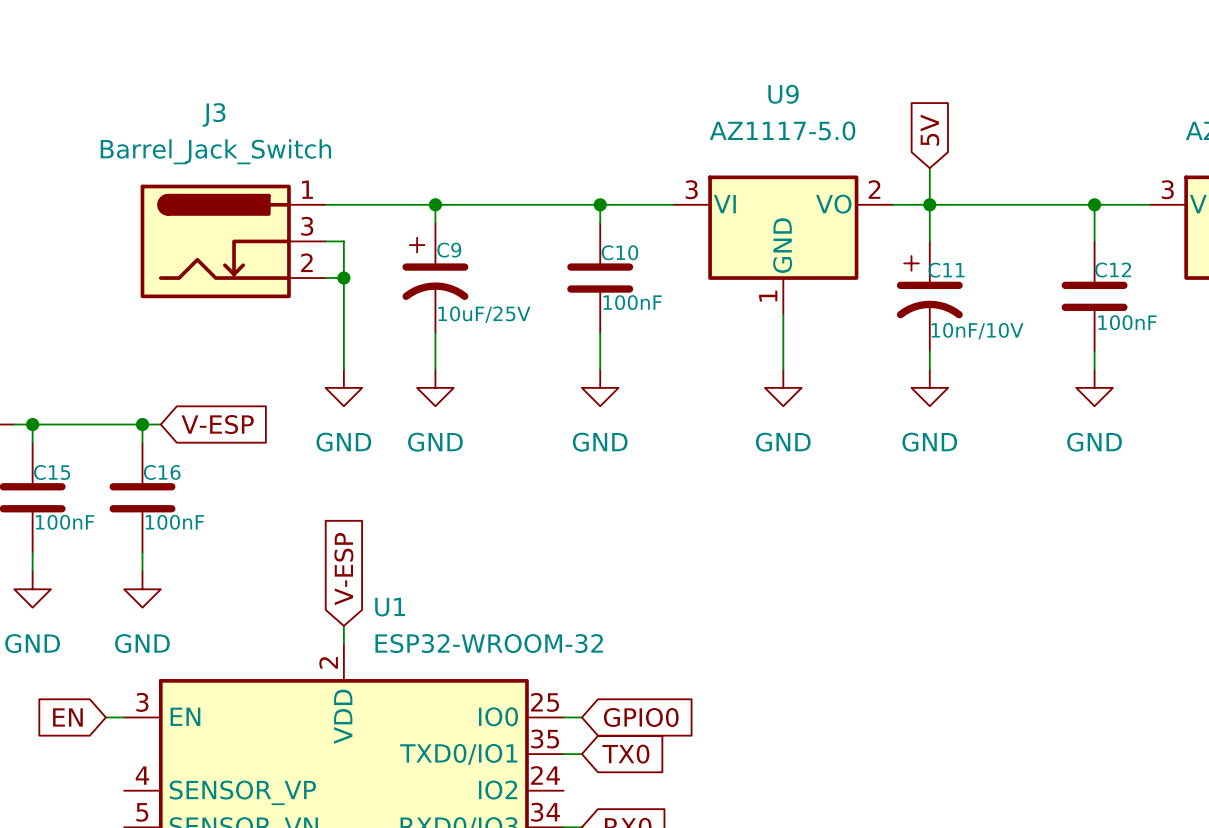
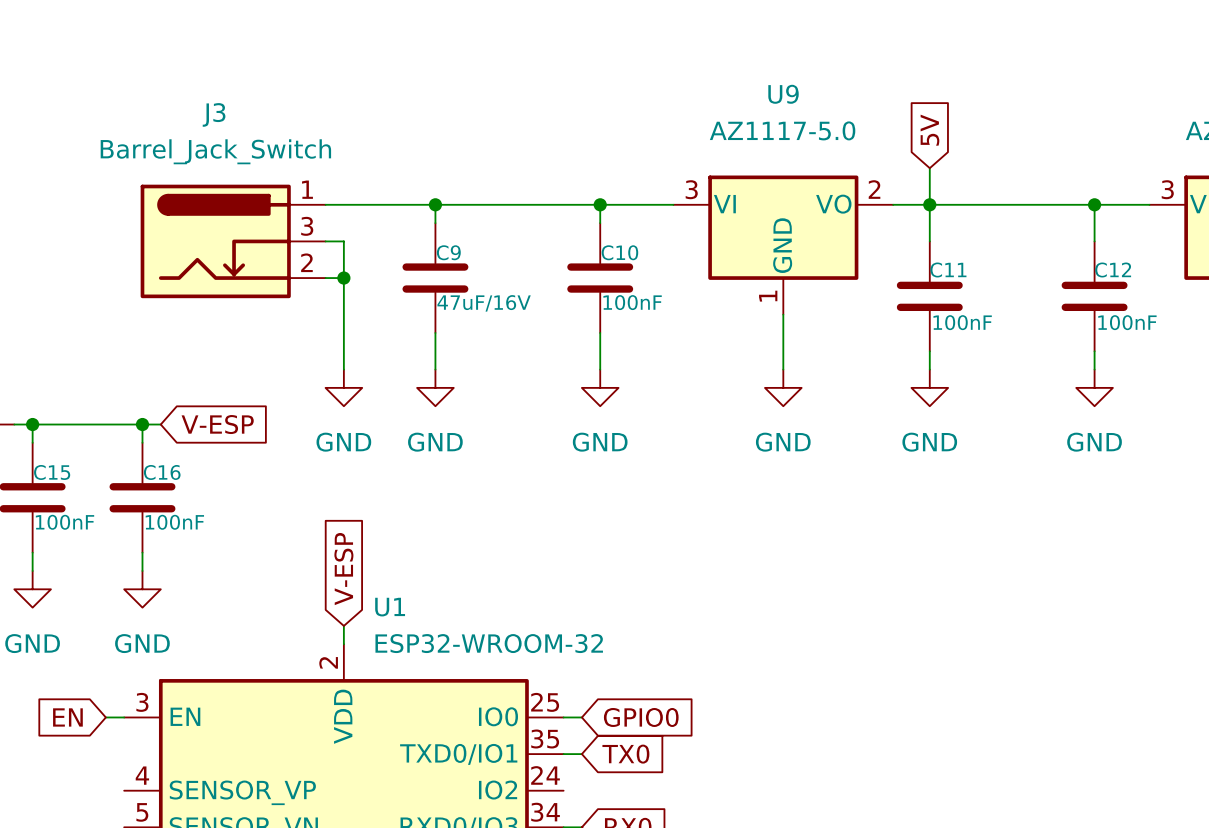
C9 symbol: [402, 223, 469, 333] -> [402, 223, 469, 333]
C11 symbol: [896, 241, 963, 352] -> [896, 241, 963, 352]
C9 value: 10uF/25V (484, 314) -> 47uF/16V (484, 303)
C11 value: 10nF/10V (977, 331) -> 100nF (962, 322)

